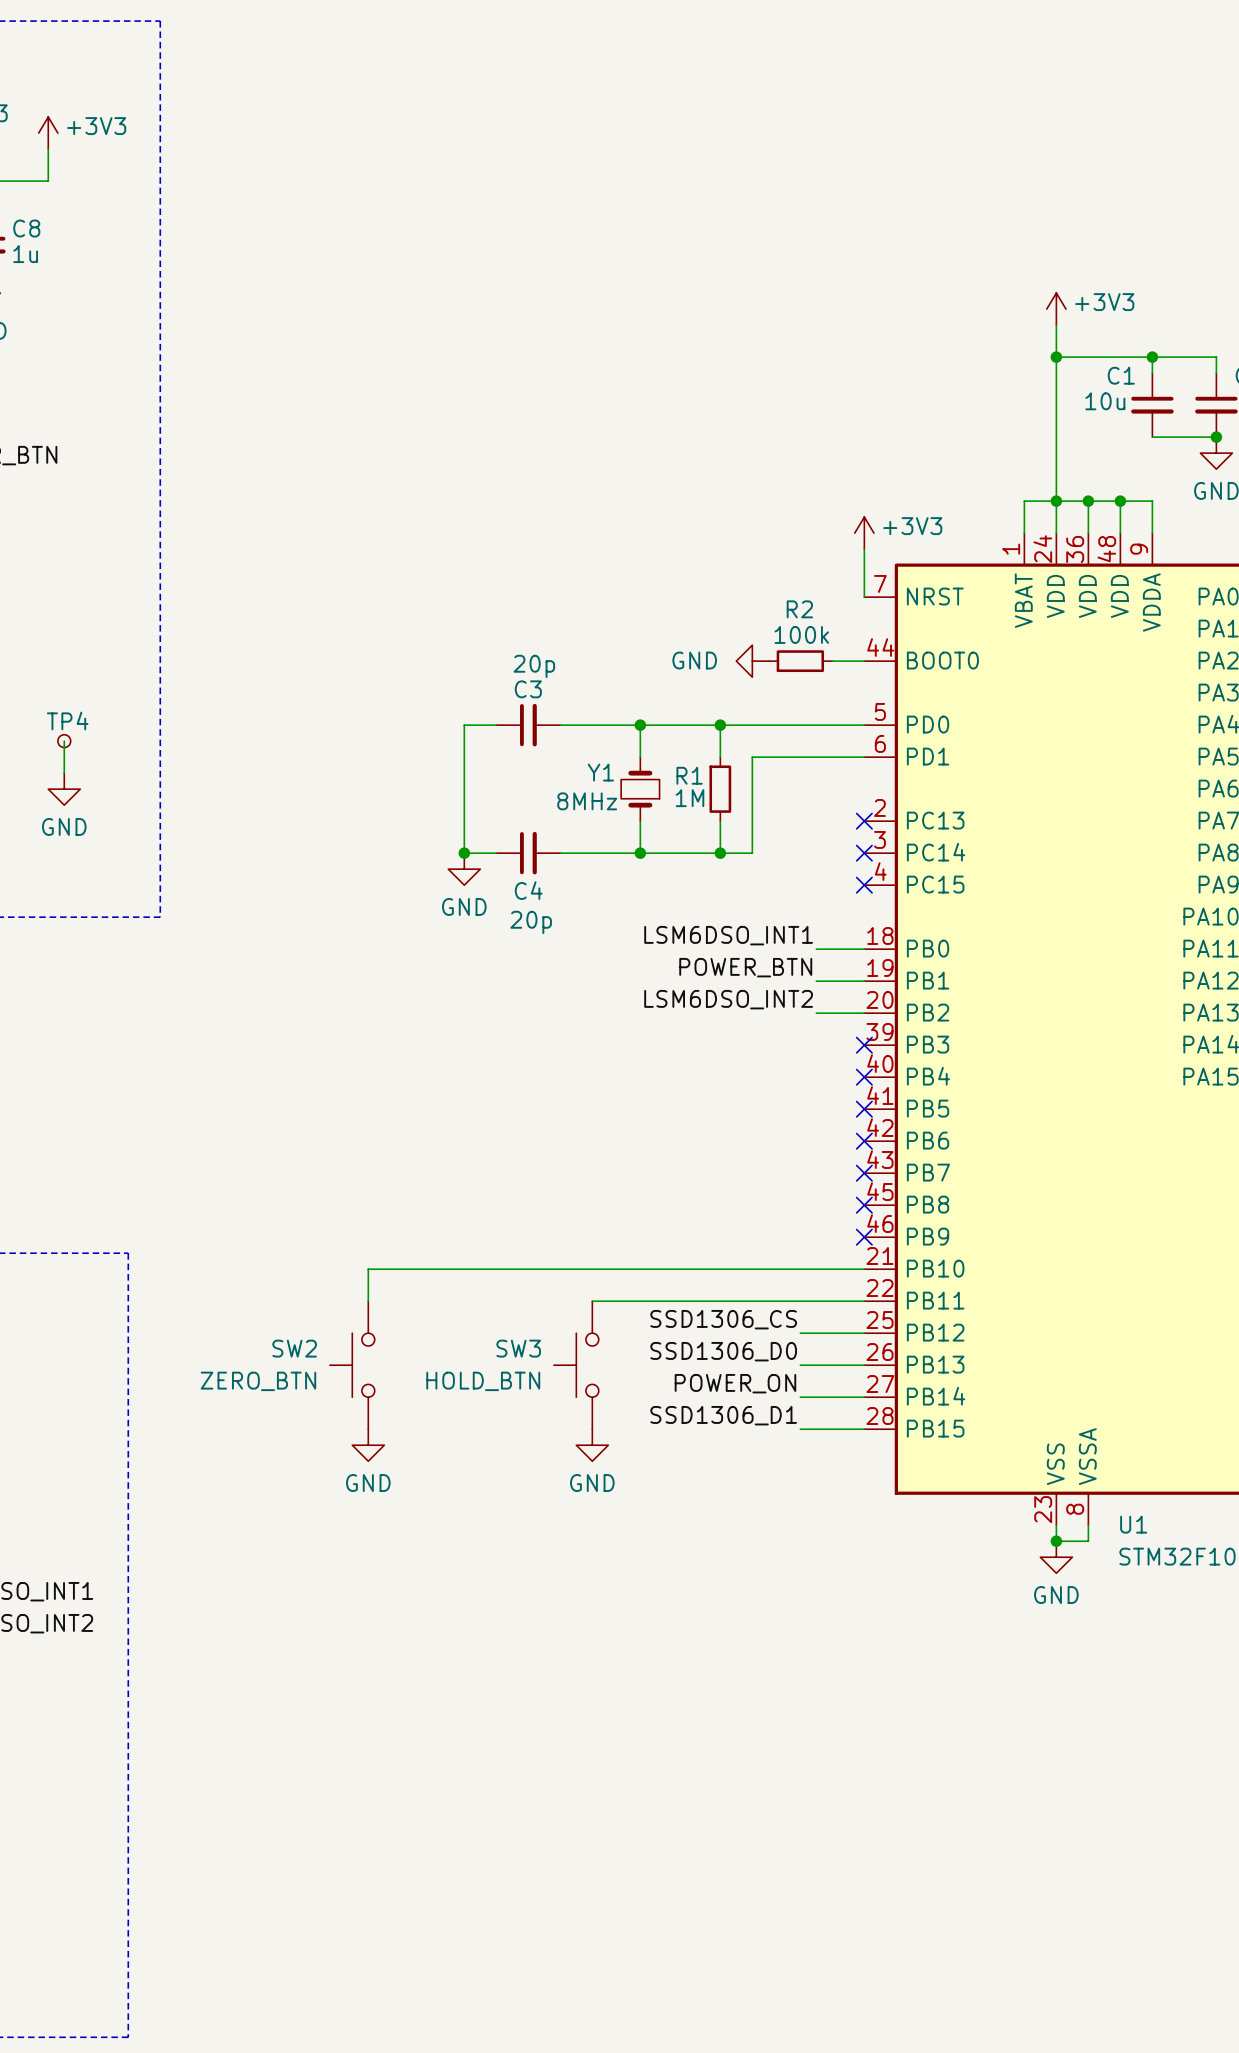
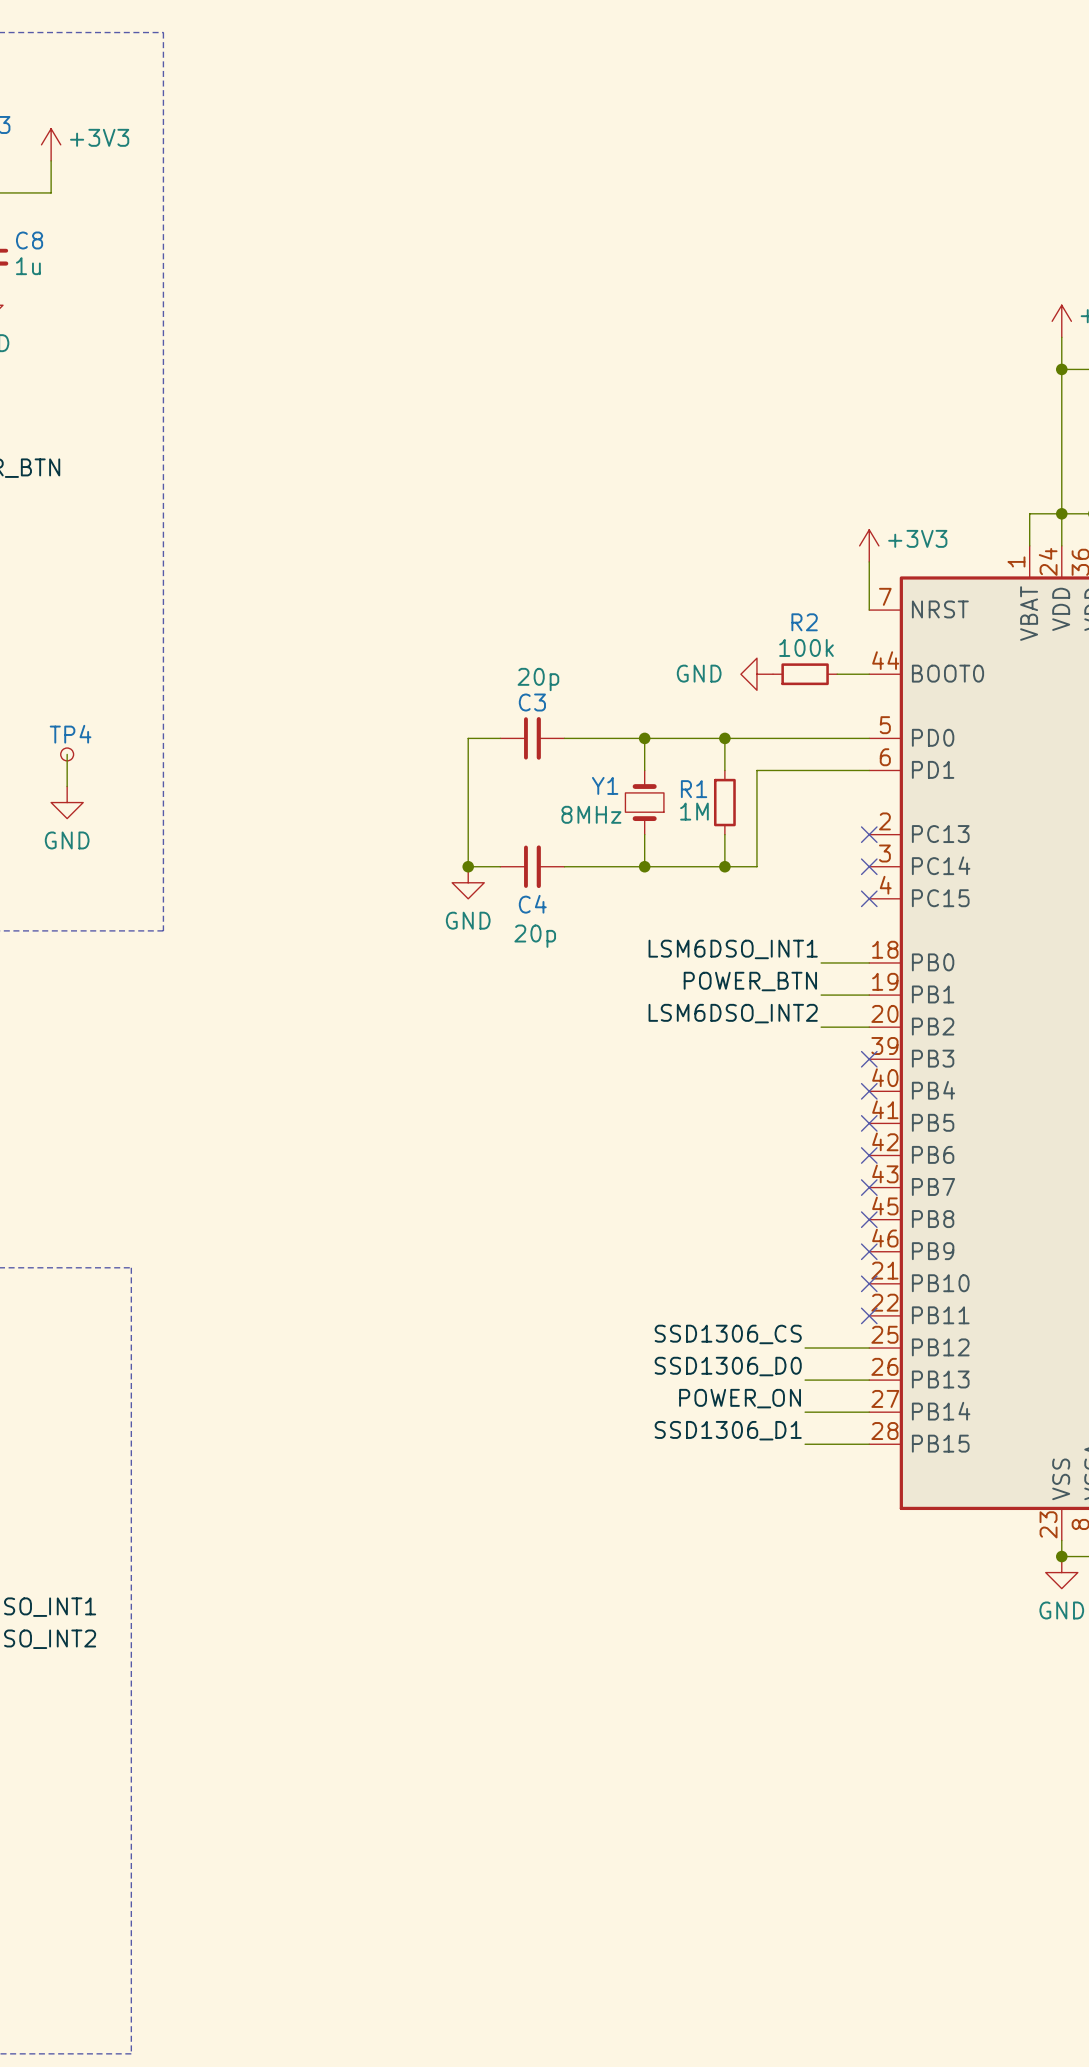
wire: (864, 1269) (368, 1269) (368, 1301) -> none
no-connect mark: none -> (869, 1283)
wire: (592, 1301) (864, 1301) -> none
no-connect mark: none -> (869, 1315)
SW2: ZERO_BTN (352, 1365) -> none
SW3: HOLD_BTN (576, 1365) -> none
power symbol: GND (368, 1445) -> none
power symbol: GND (592, 1445) -> none

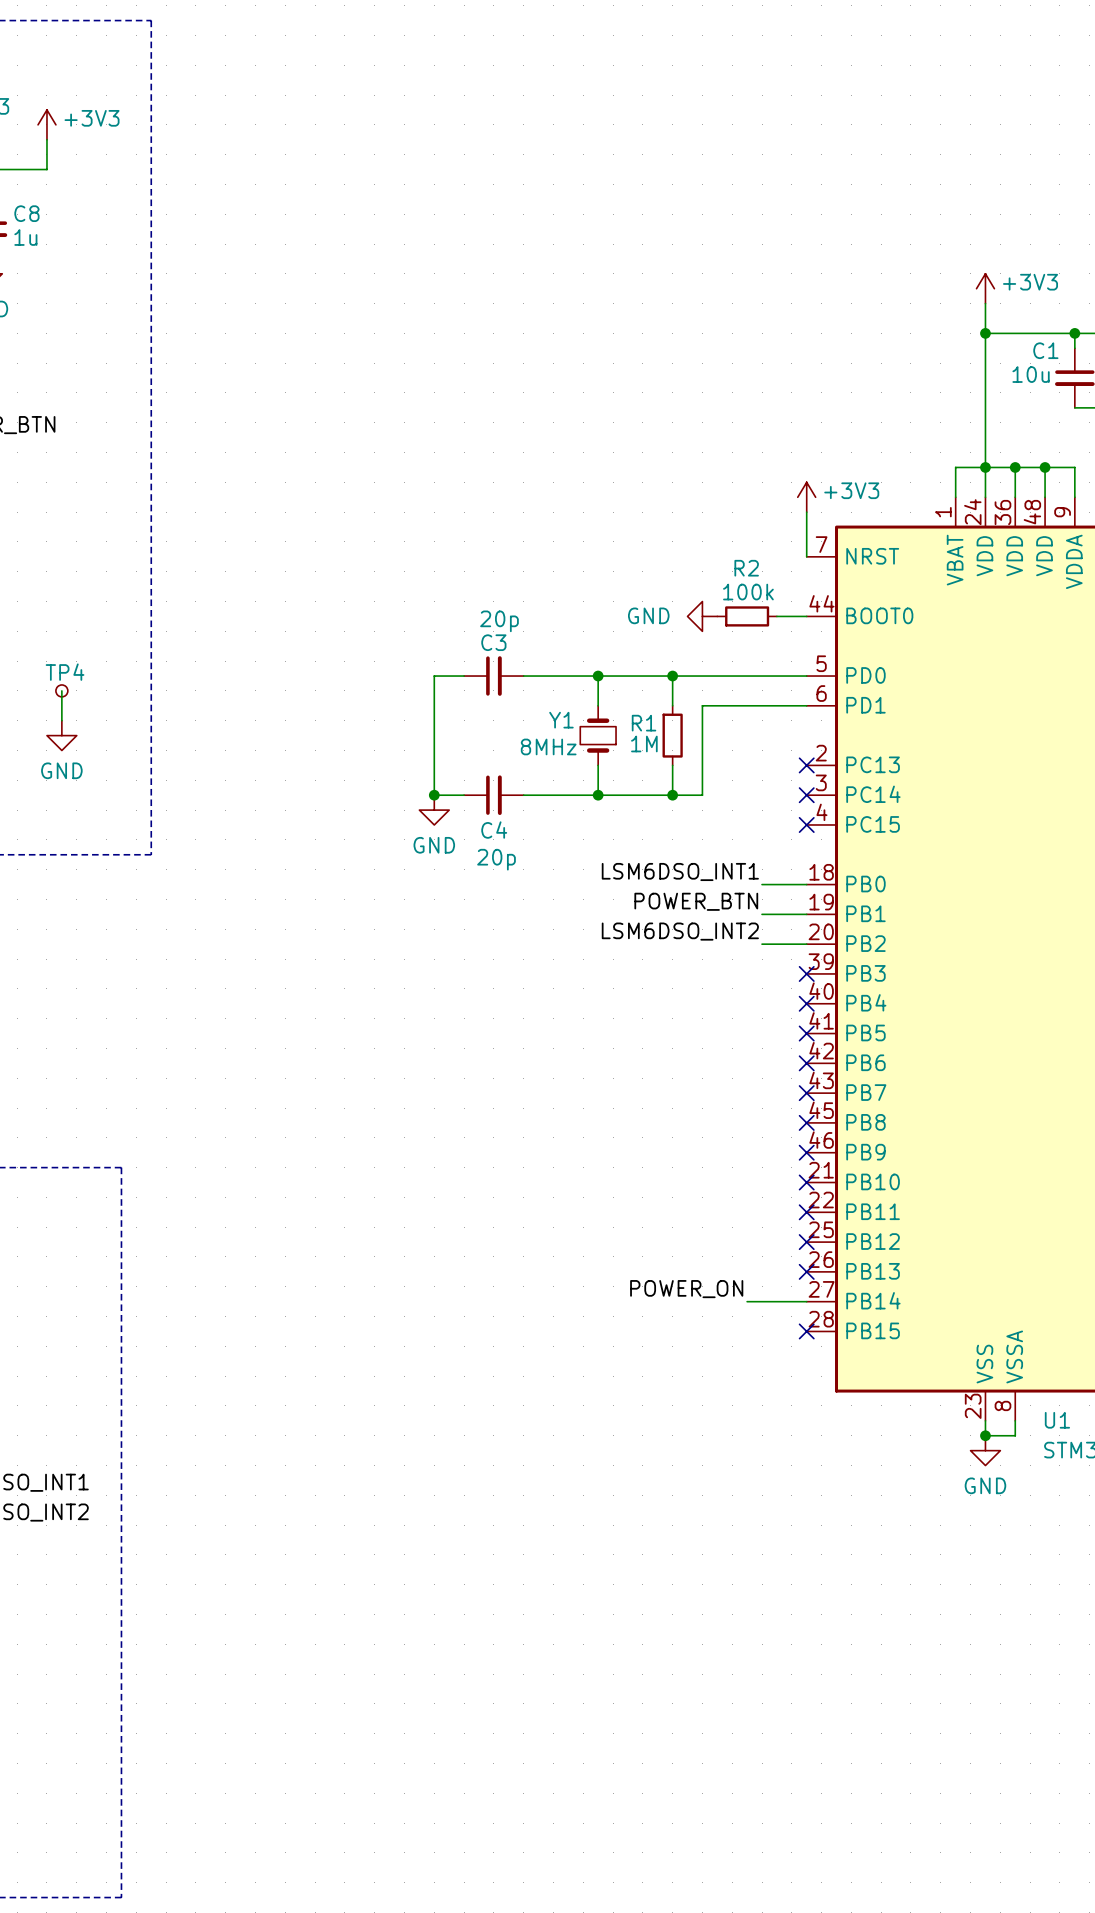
label: SSD1306_CS (728, 1334) -> none
wire: (805, 1348) (869, 1348) -> none
no-connect mark: none -> (806, 1242)
label: SSD1306_D0 (728, 1366) -> none
wire: (805, 1380) (869, 1380) -> none
no-connect mark: none -> (806, 1271)
label: SSD1306_D1 (728, 1430) -> none
wire: (805, 1444) (869, 1444) -> none
no-connect mark: none -> (806, 1331)

